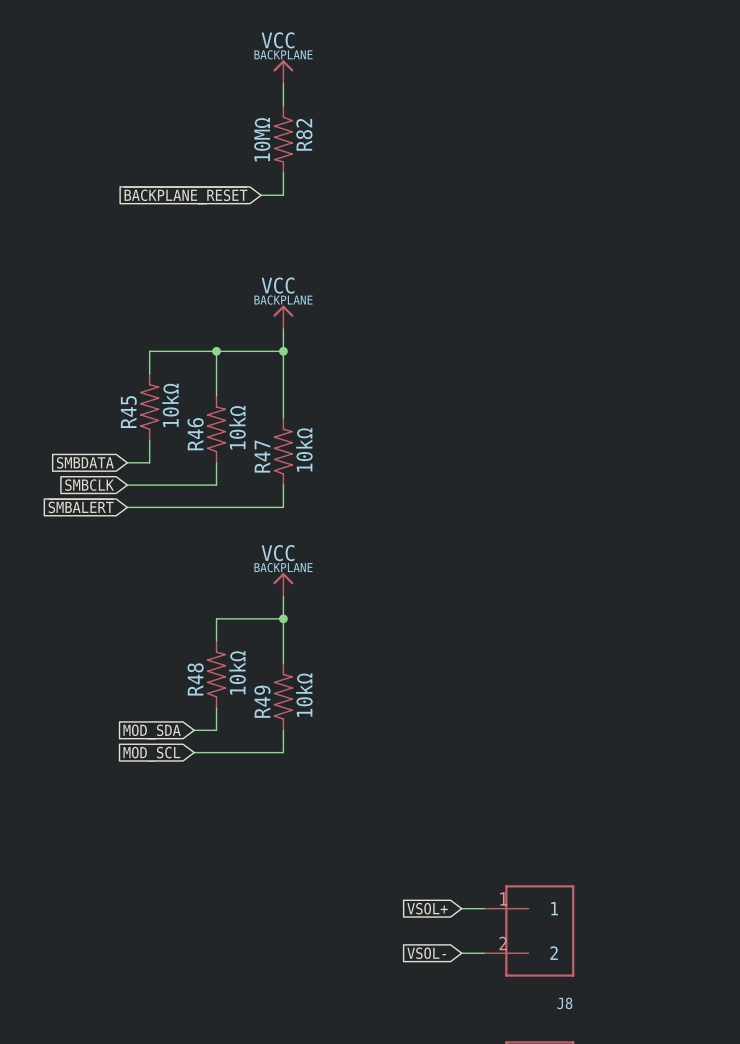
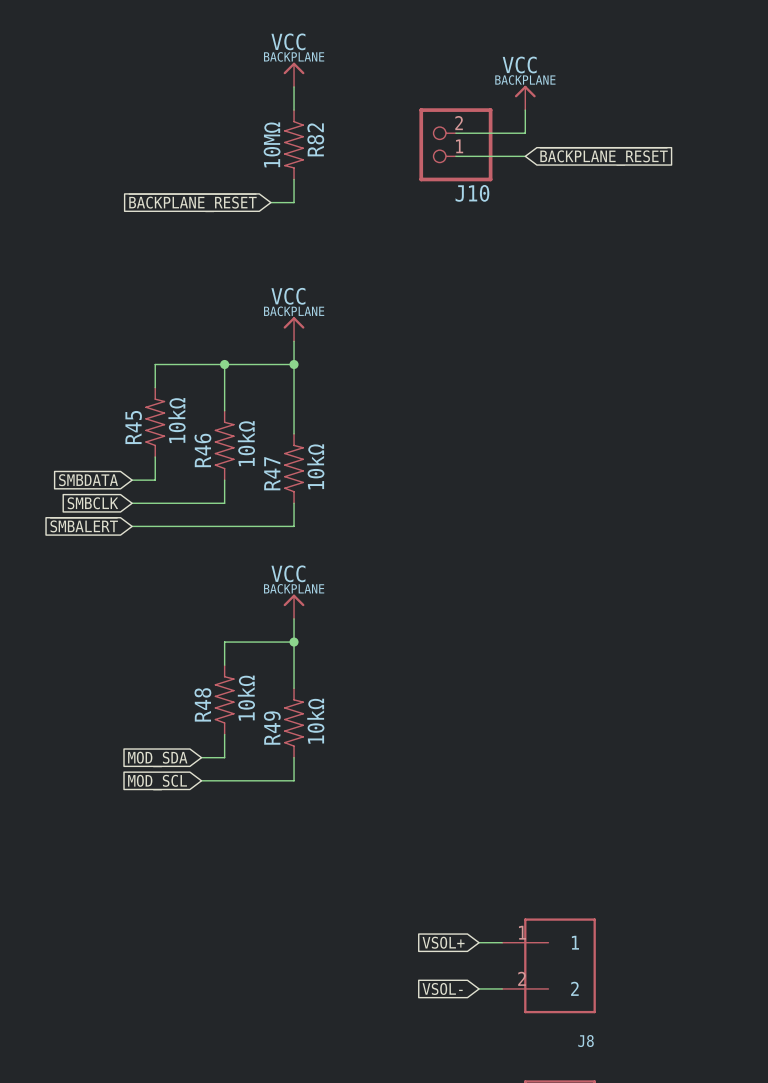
power symbol: none -> (525, 97)
wire: none -> (525, 110) (525, 133) (455, 133)
J10: none -> (455, 144)
wire: none -> (455, 156) (525, 156)
global label: none -> ~{BACKPLANE_RESET} (604, 156)

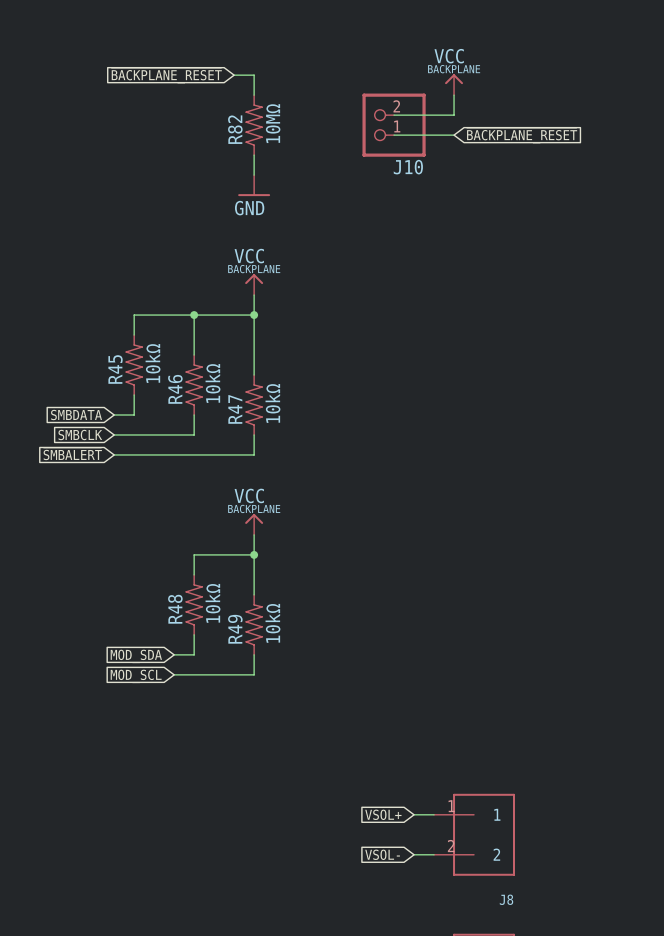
power symbol: (294, 74) -> none
R82 rotation: 0° (294, 144) -> 180° (254, 125)
wire: (270, 202) (294, 202) -> (234, 75) (254, 75)
global label position: ~{BACKPLANE_RESET} (192, 203) -> ~{BACKPLANE_RESET} (166, 75)
power symbol: none -> GND (254, 185)

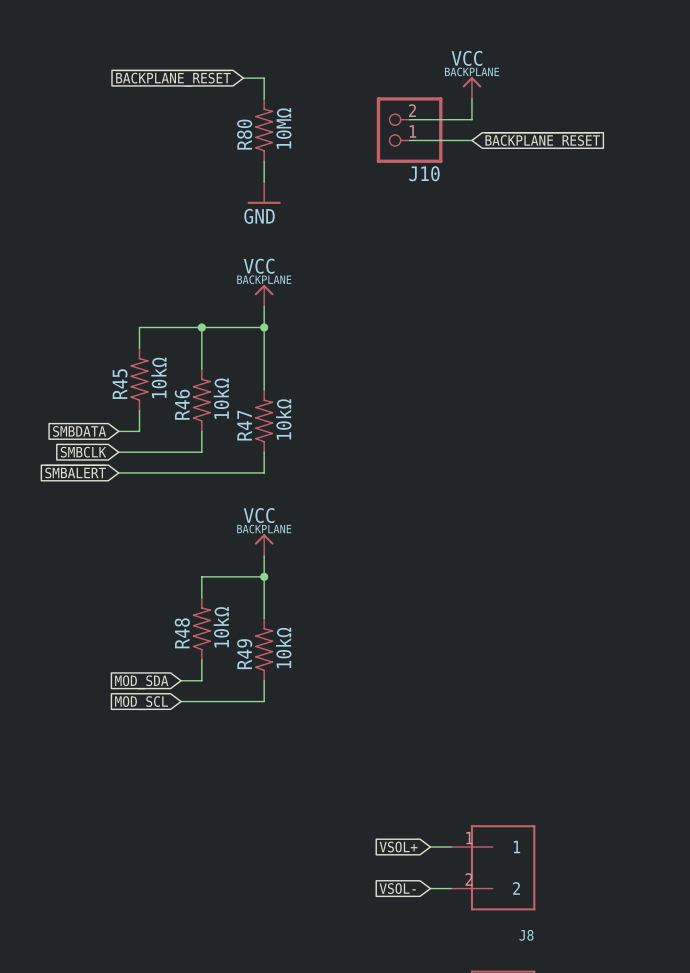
R82 name: R82 (235, 129) -> R80 (244, 134)

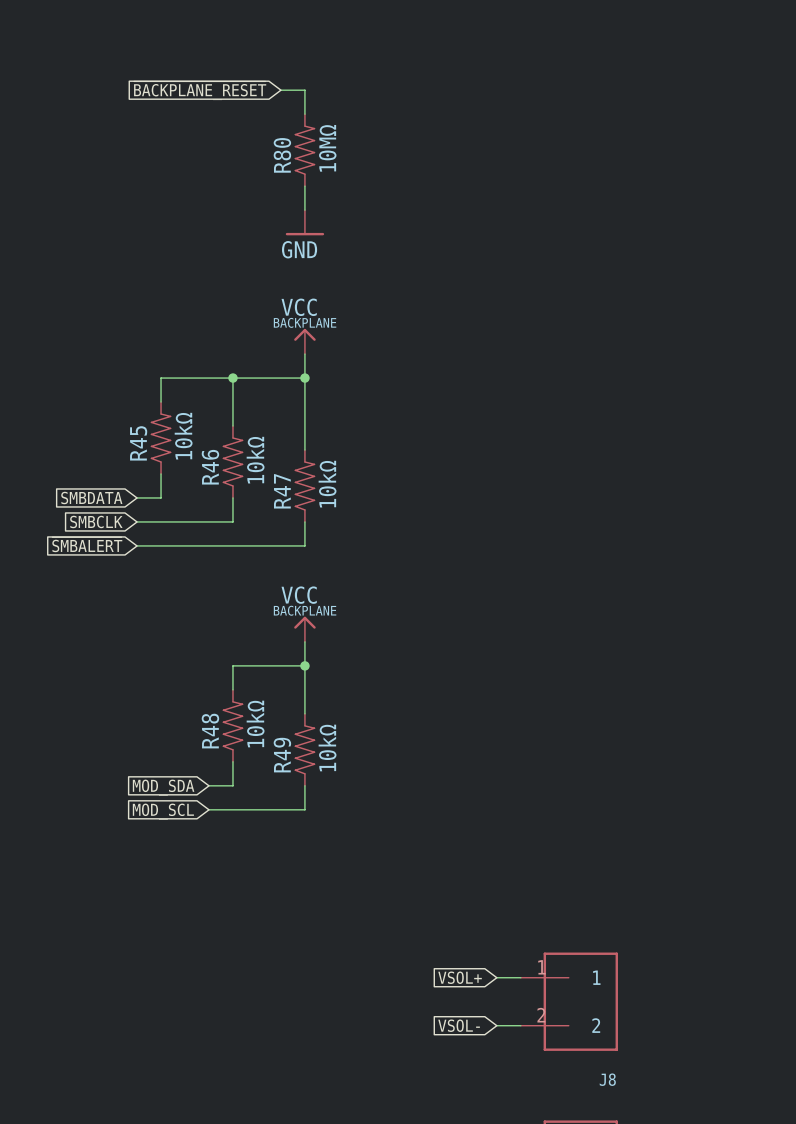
power symbol: (471, 88) -> none
wire: (471, 98) (471, 119) (409, 119) -> none
J10: (409, 130) -> none
wire: (409, 140) (471, 140) -> none
global label: ~{BACKPLANE_RESET} (542, 140) -> none

